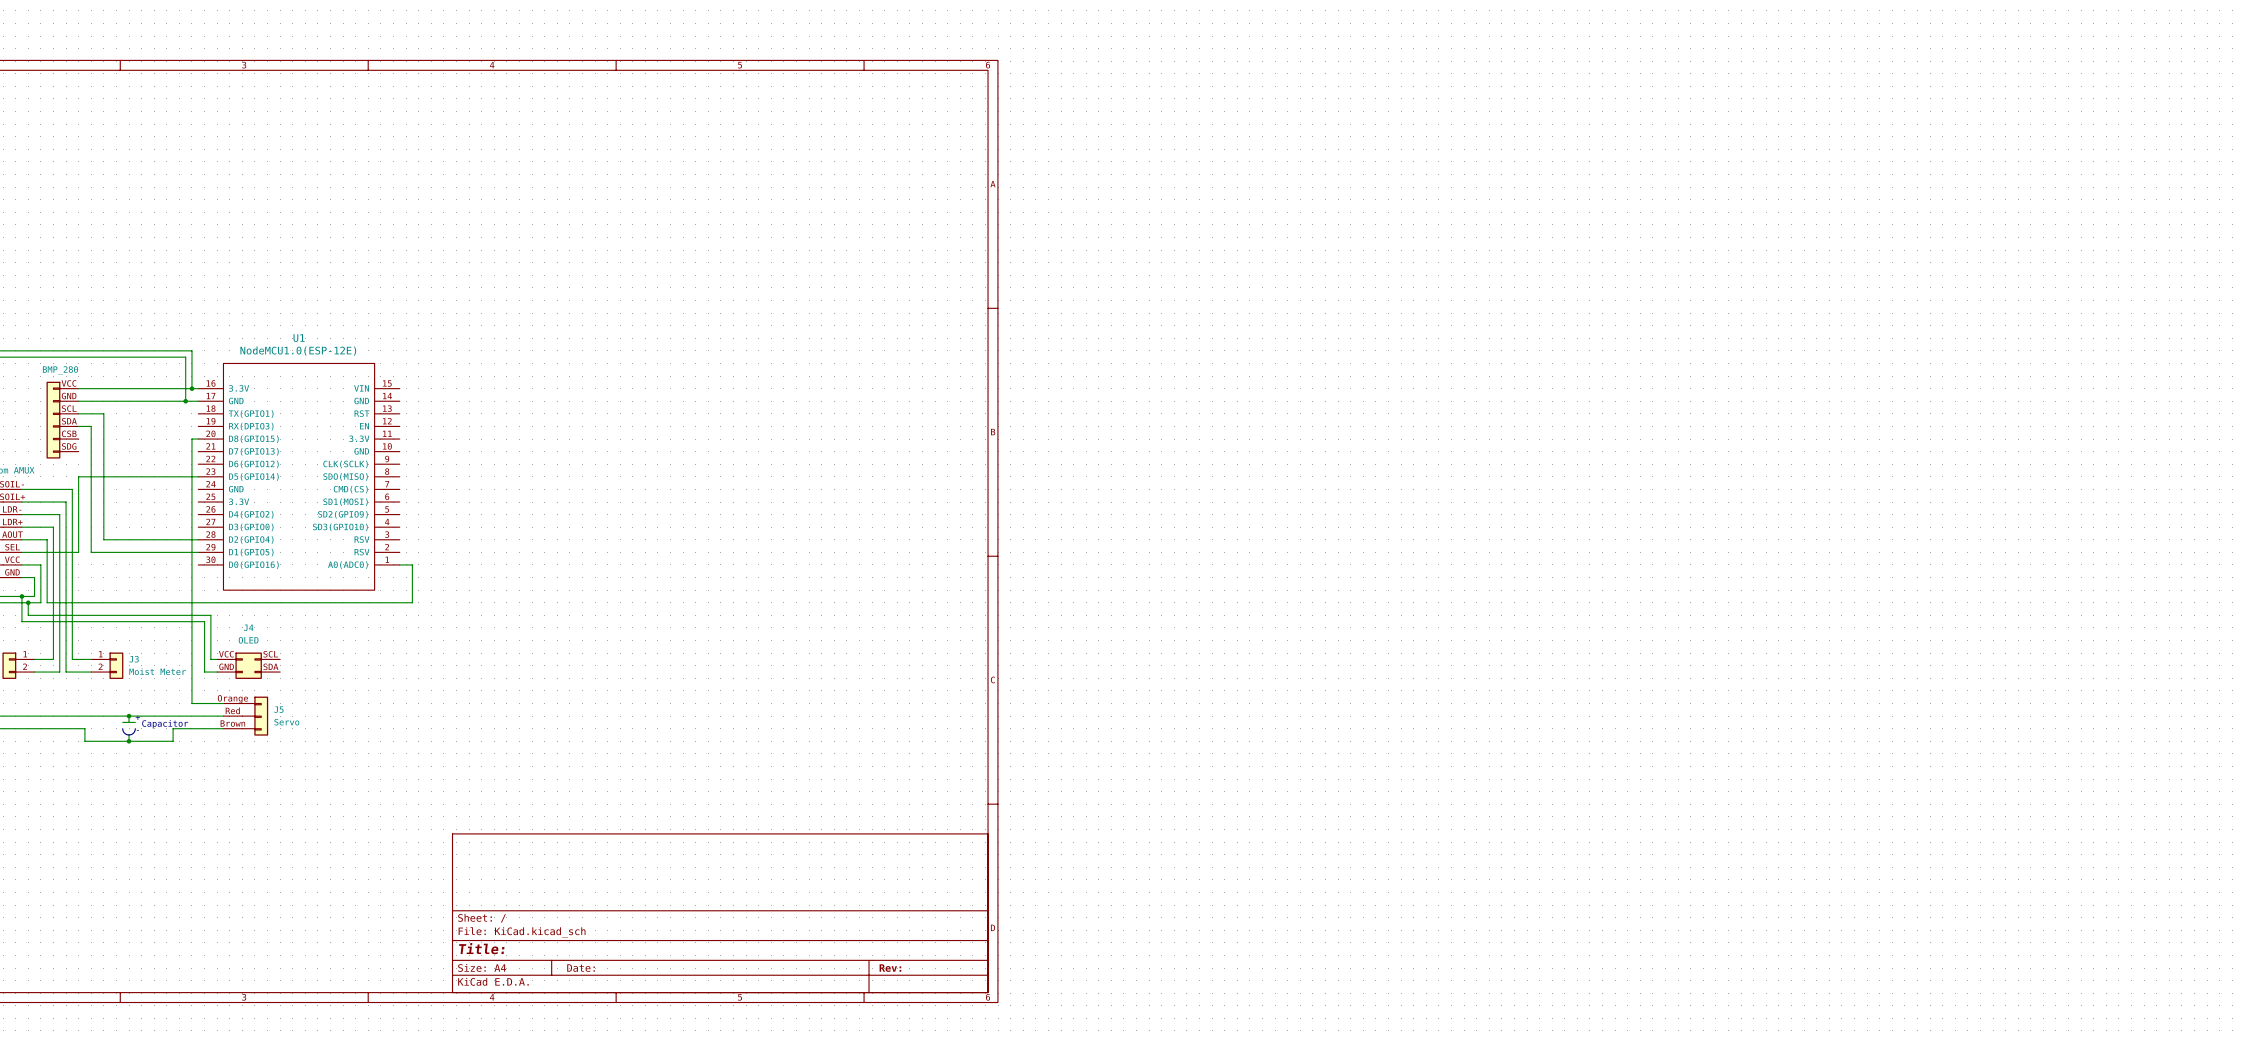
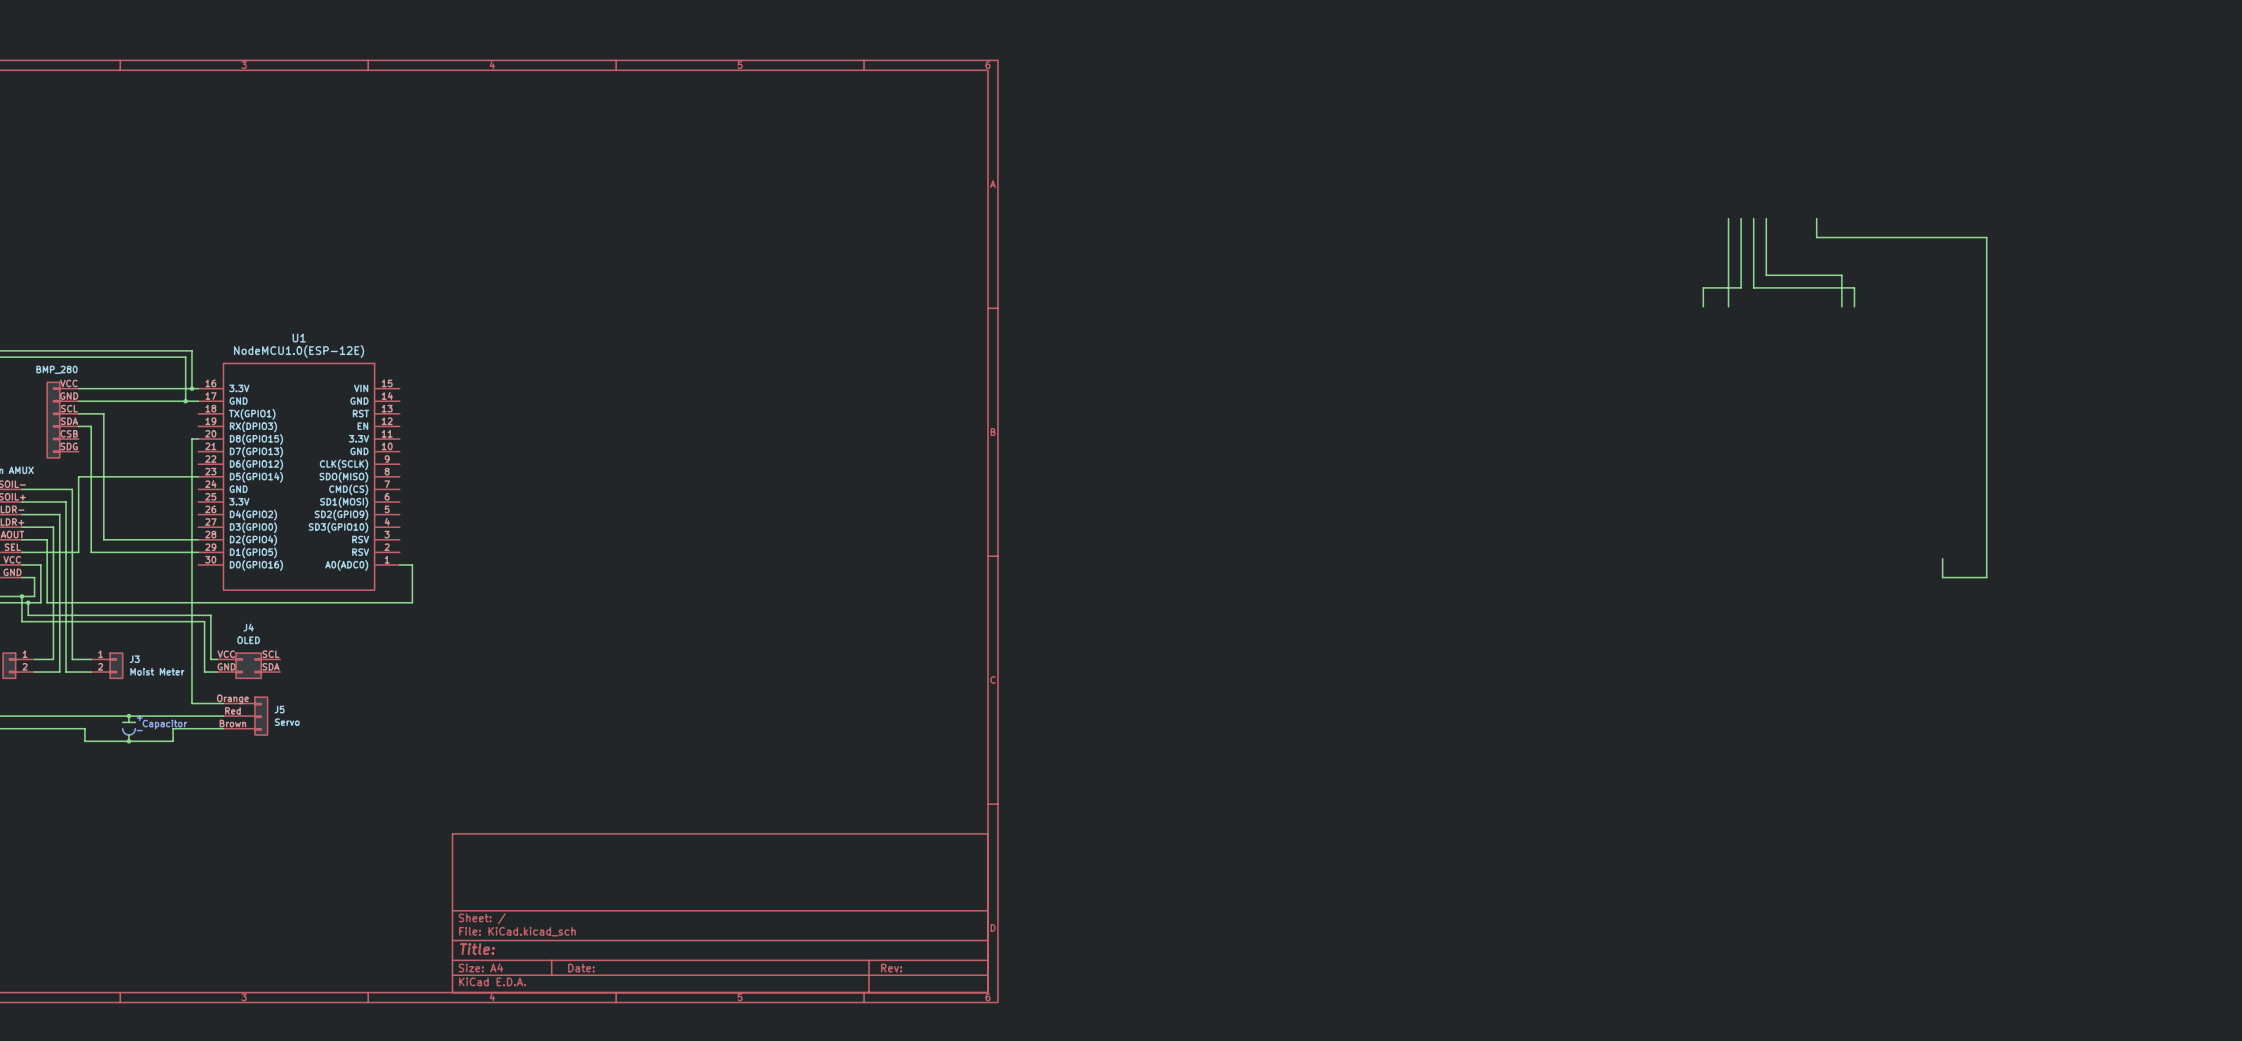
wire: none -> (1728, 218) (1728, 306)
wire: none -> (1741, 218) (1741, 287) (1703, 287) (1703, 306)
wire: none -> (1753, 218) (1753, 287) (1854, 287) (1854, 306)
wire: none -> (1766, 218) (1766, 275) (1841, 275) (1841, 306)
wire: none -> (1816, 218) (1816, 237) (1986, 237) (1986, 577) (1942, 577) (1942, 558)

